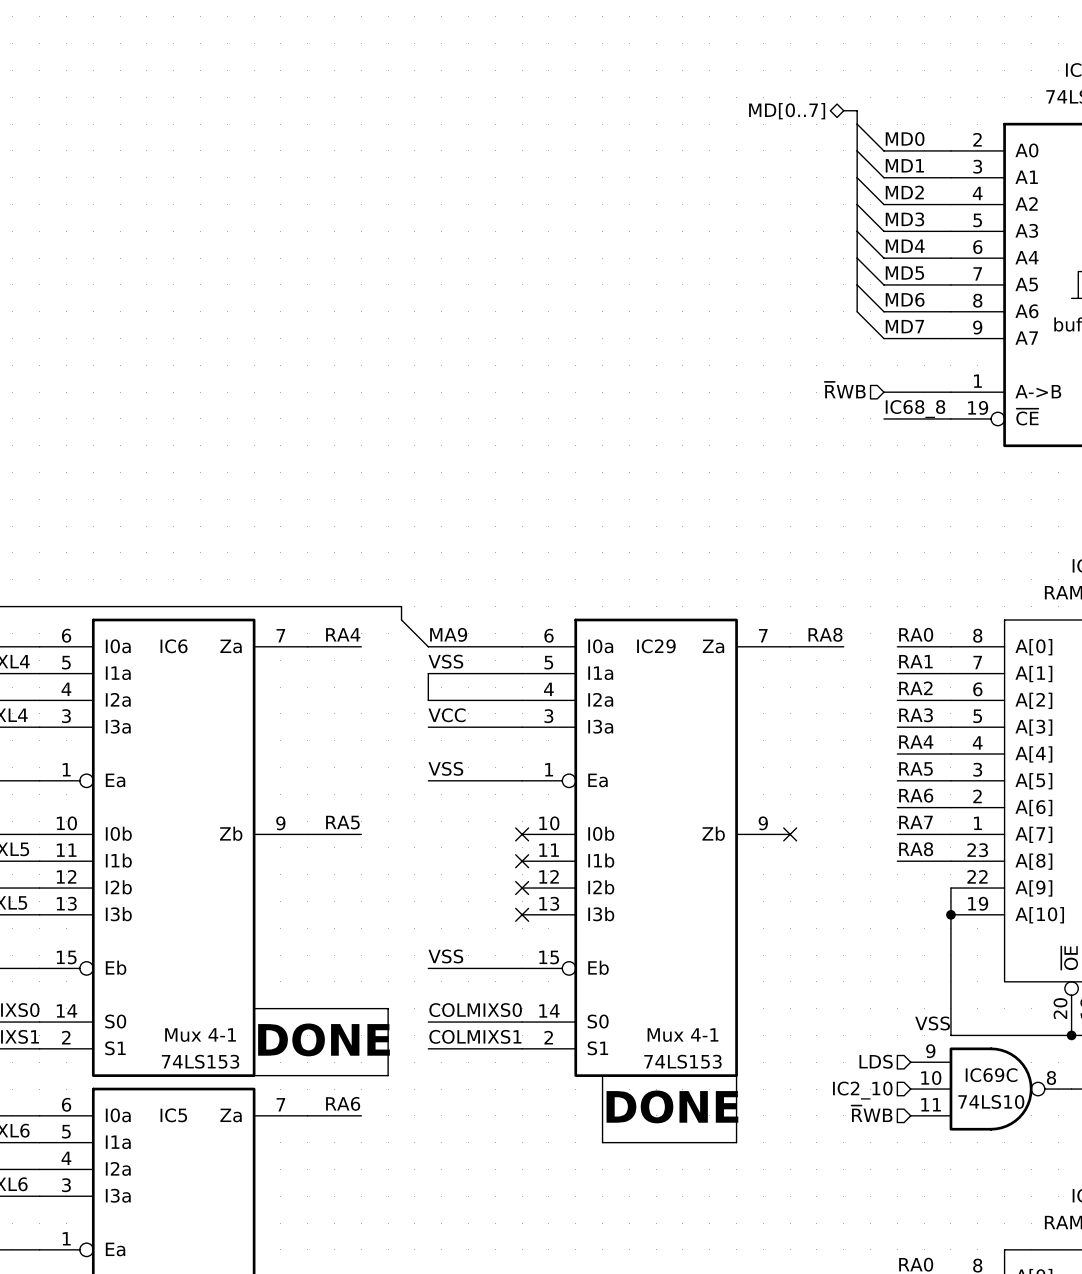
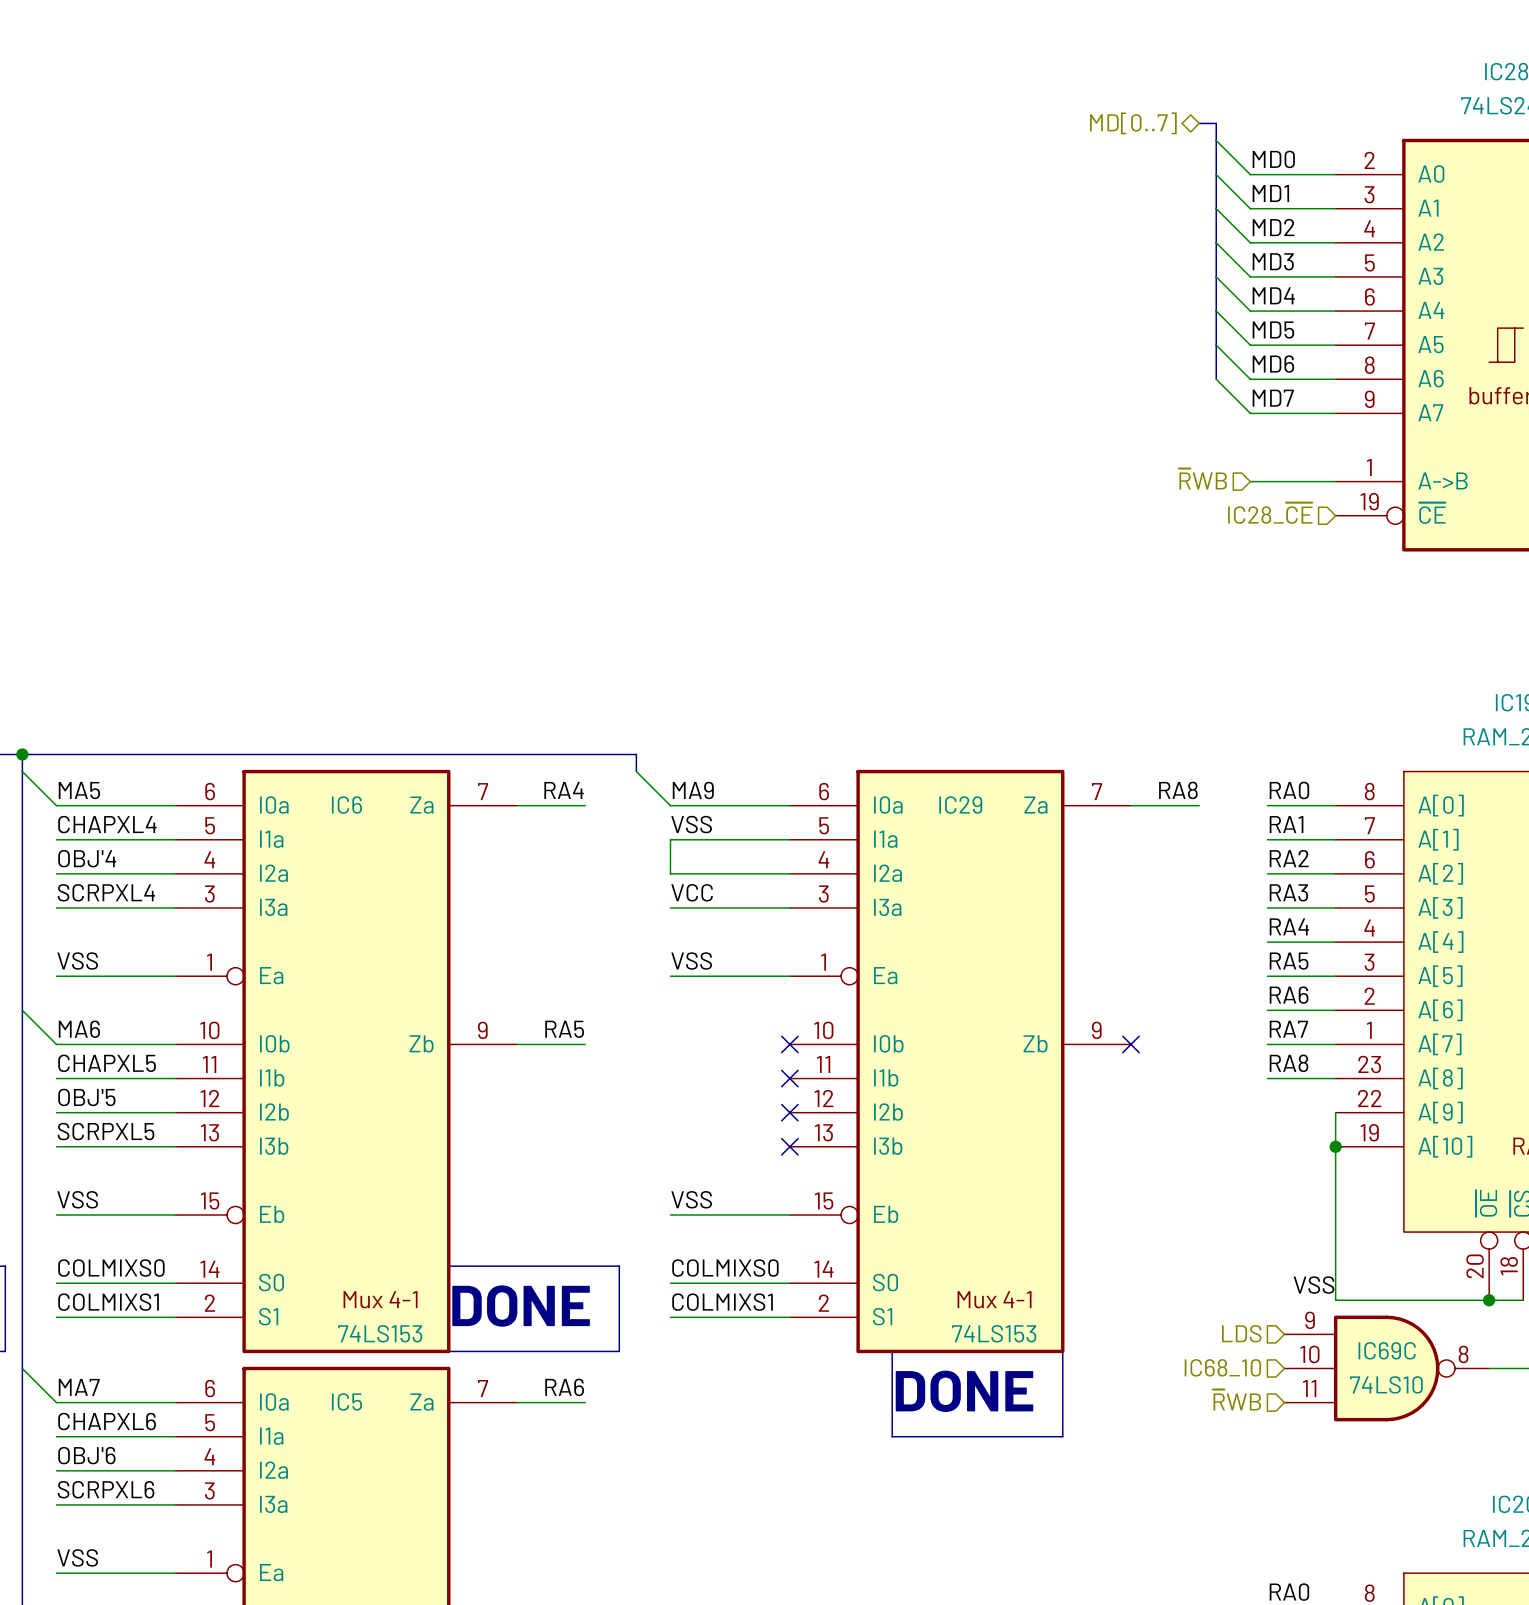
label: IC68_8 (915, 409) -> none
wire: (883, 418) (950, 418) -> none
hierarchical label: none -> IC28_~{CE} (1270, 513)
hierarchical label: IC2_10 (862, 1090) -> IC68_10 (1222, 1367)

